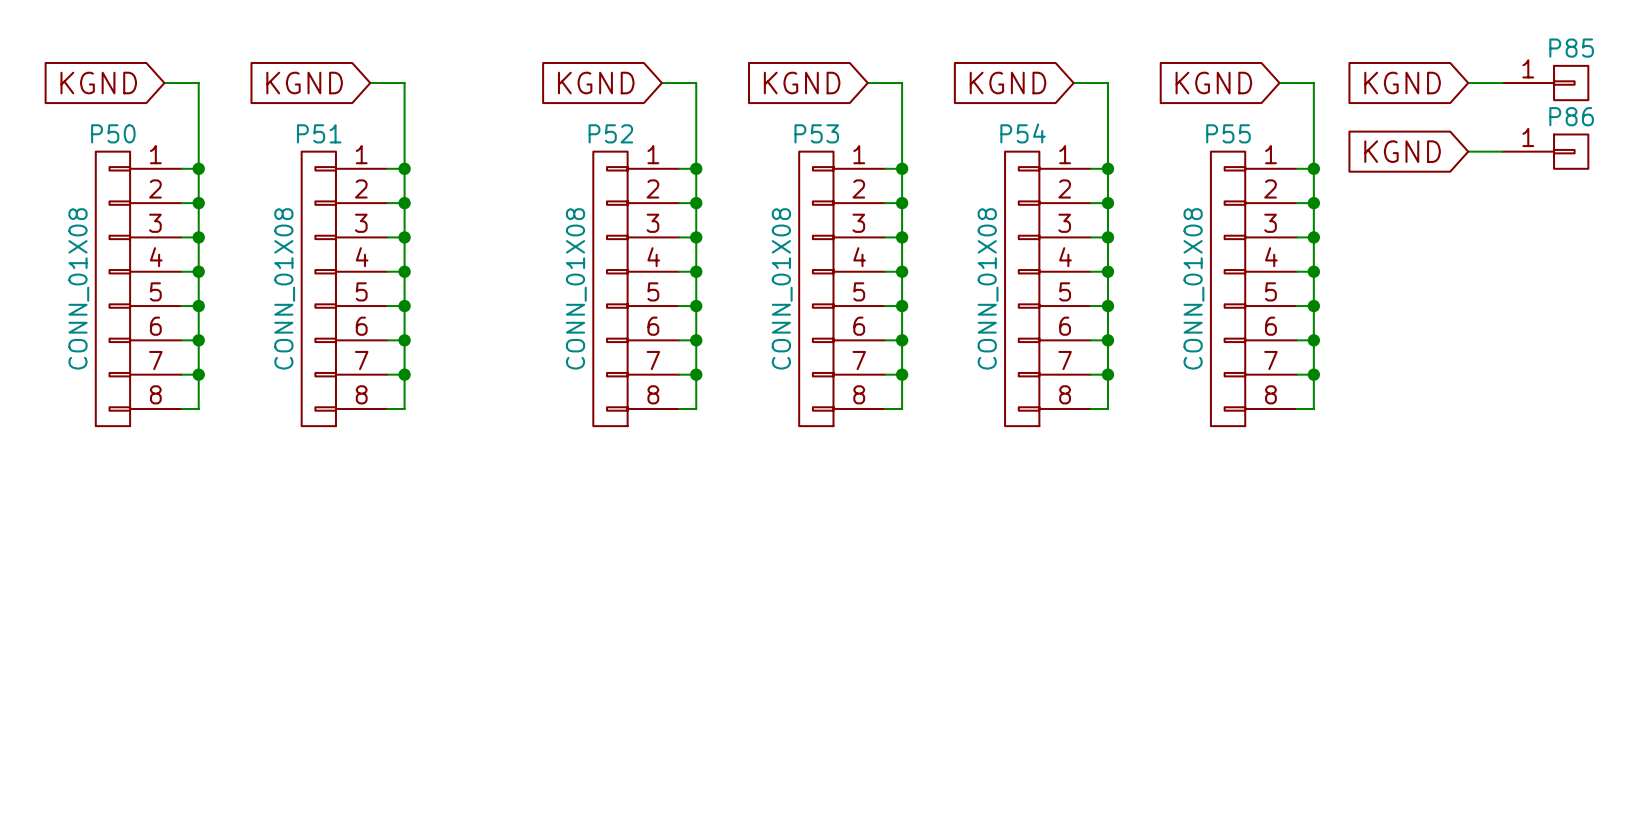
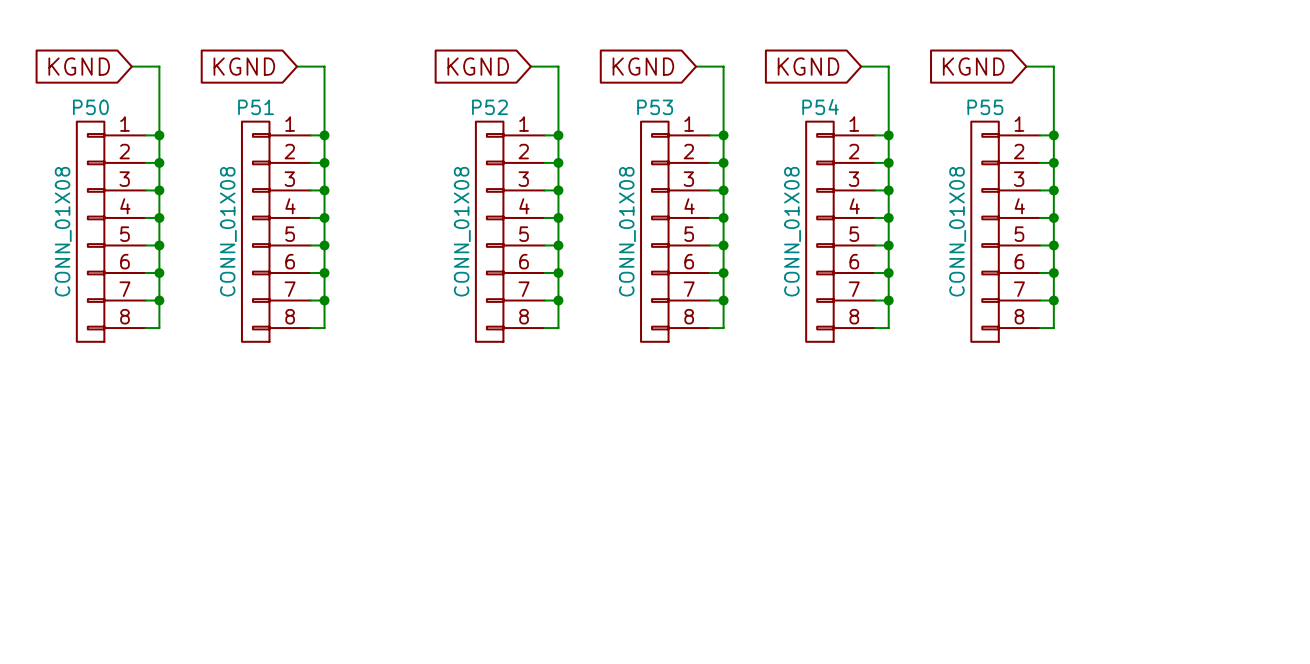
global label: KGND (1402, 83) -> none
wire: (1468, 83) (1502, 83) -> none
P85: (1545, 83) -> none
global label: KGND (1402, 151) -> none
wire: (1468, 151) (1502, 151) -> none
P86: (1545, 151) -> none

